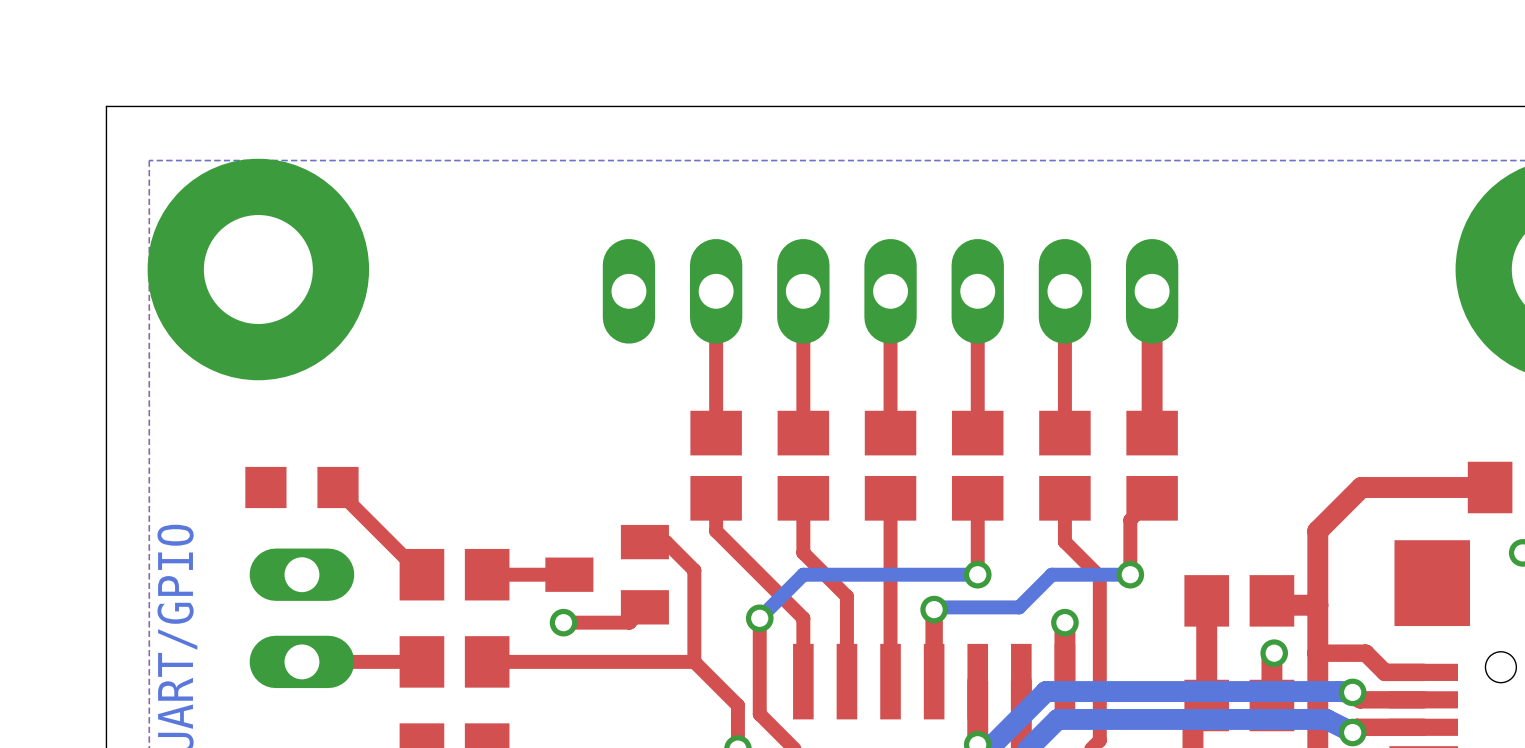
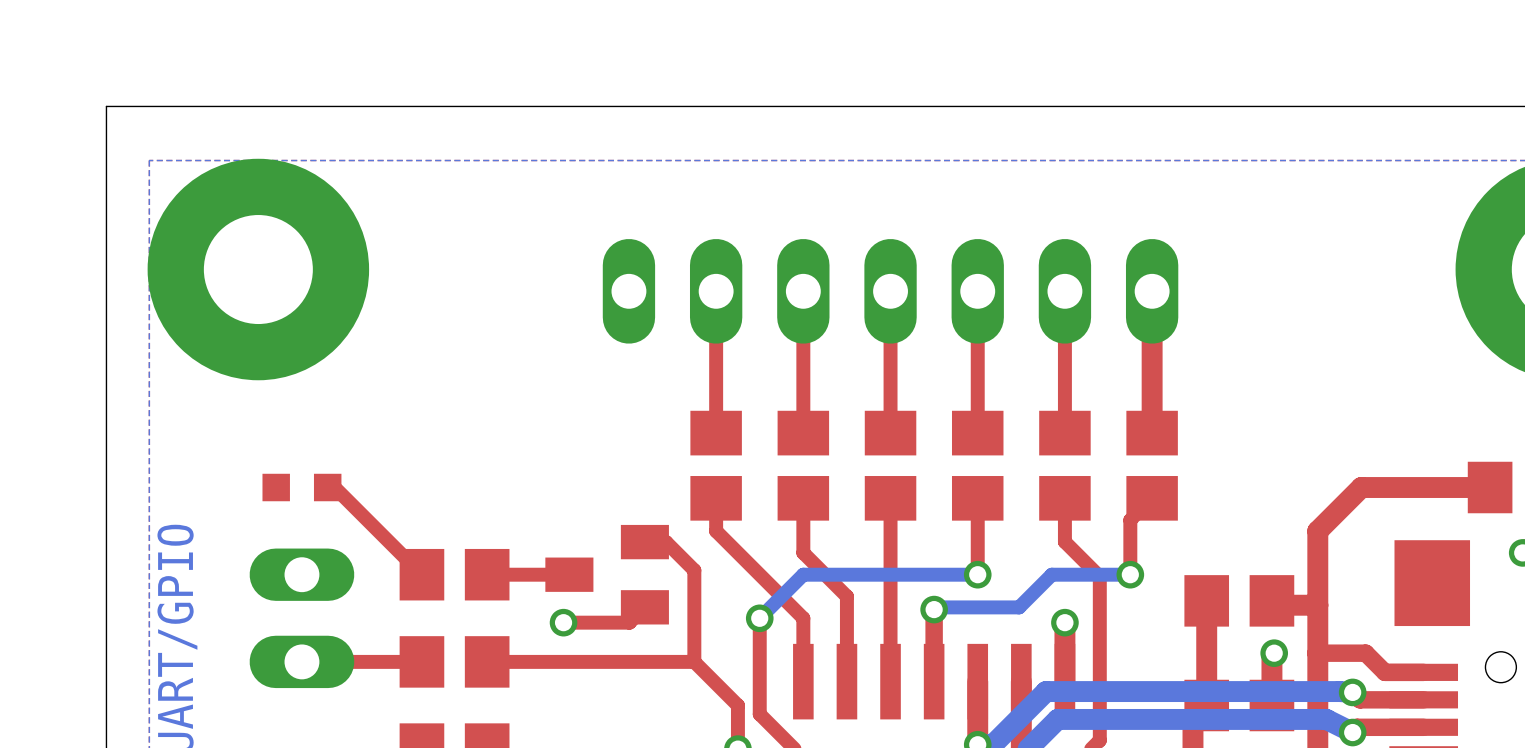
part footprint: [245, 466, 359, 509] -> [262, 473, 342, 502]

